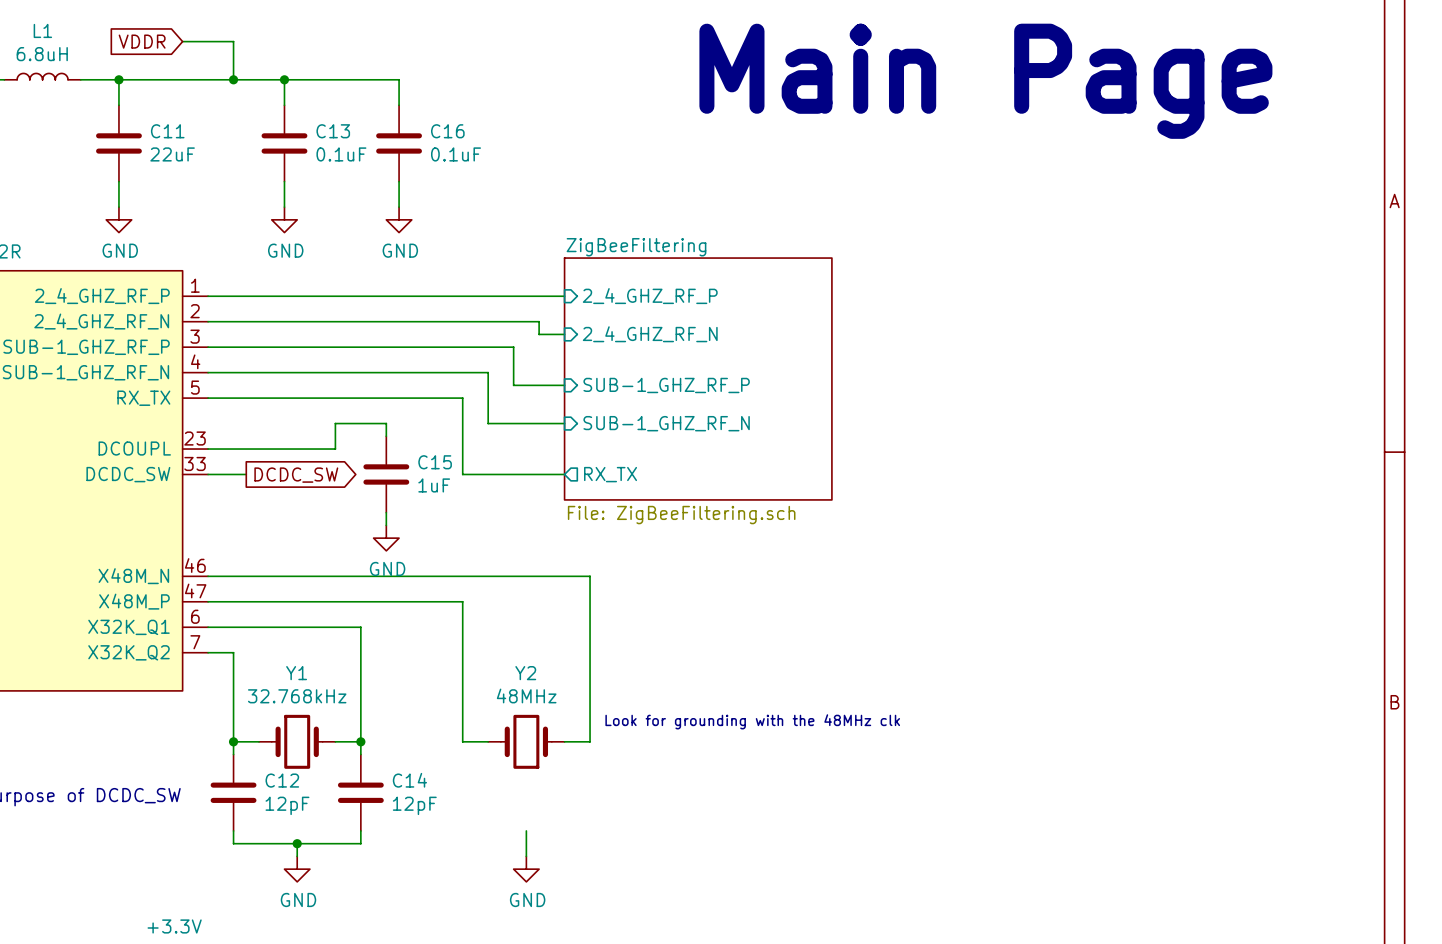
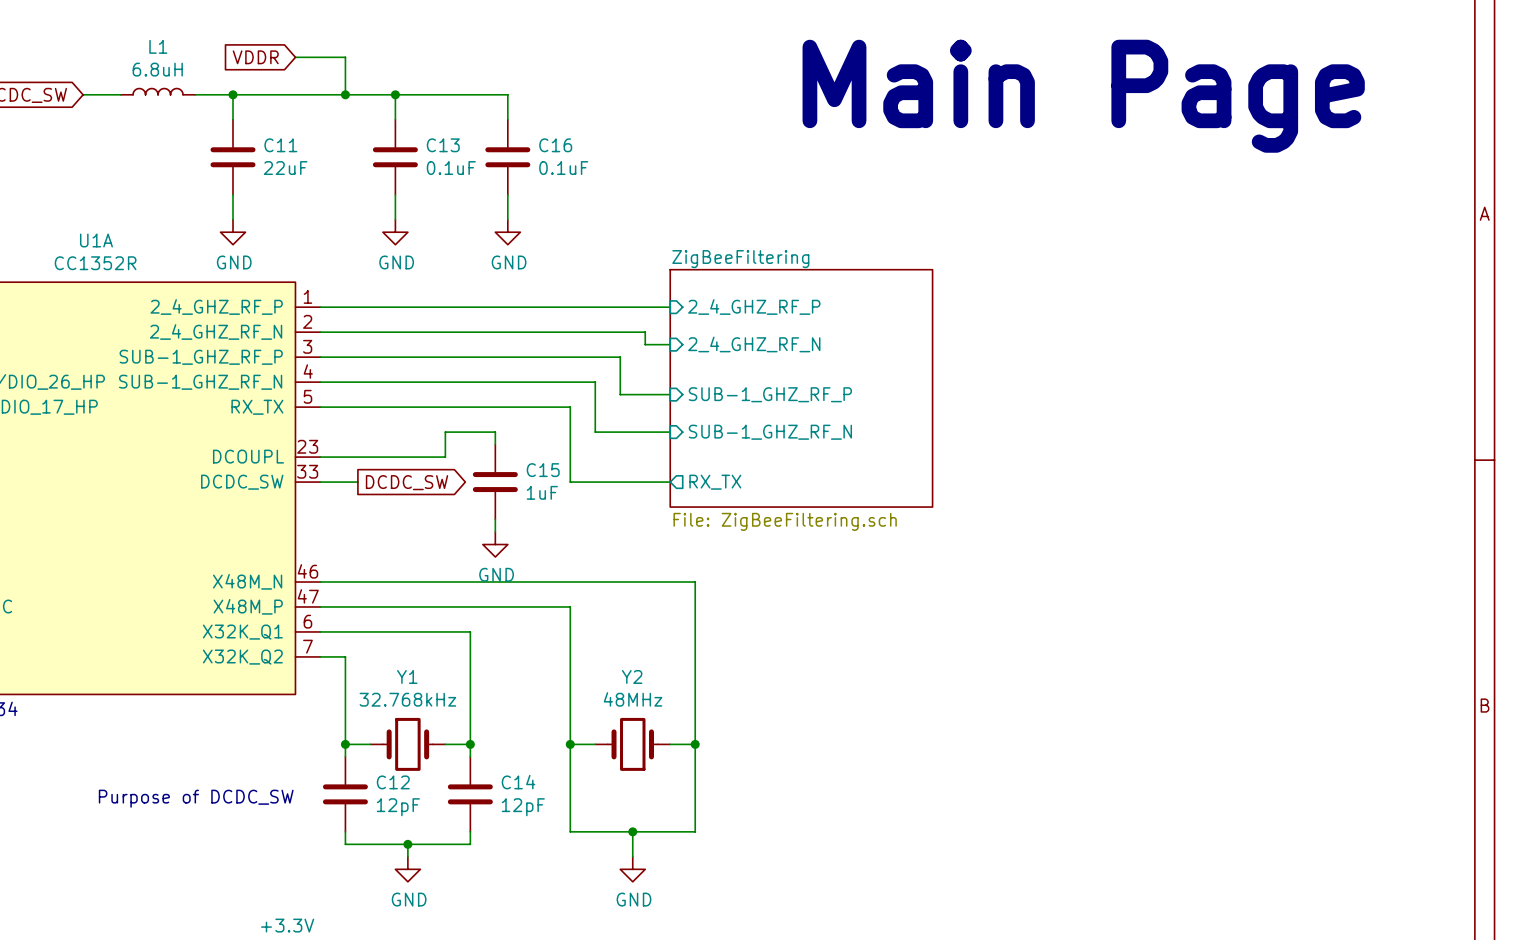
text: Look for grounding with the 48MHz clk (752, 721) -> none
wire: none -> (570, 744) (570, 831) (695, 831) (695, 744)
junction: none -> (570, 744)
junction: none -> (695, 744)
junction: none -> (632, 831)

